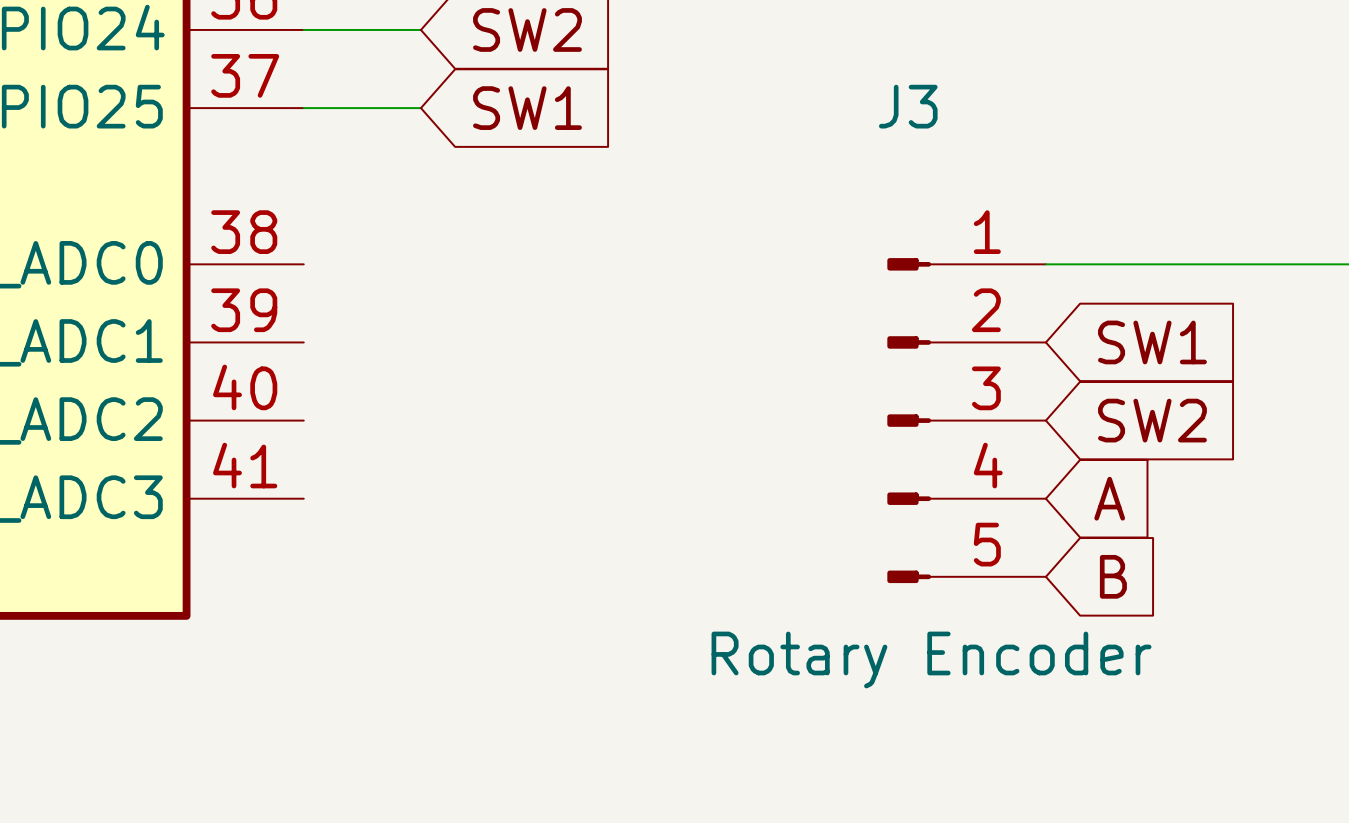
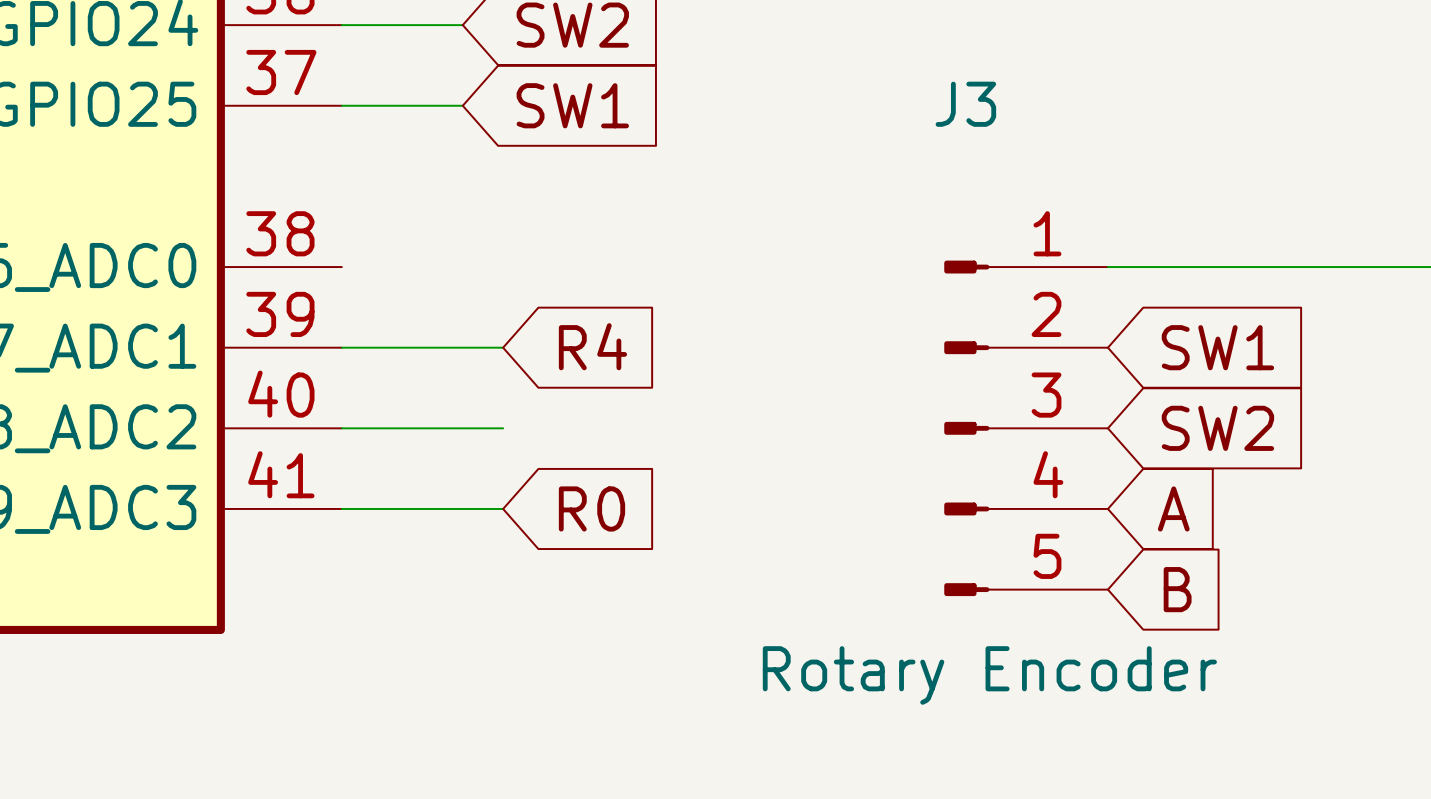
global label: none -> R4 (592, 346)
wire: none -> (341, 347) (503, 347)
wire: none -> (341, 428) (503, 428)
wire: none -> (341, 508) (503, 508)
global label: none -> R0 (591, 508)

